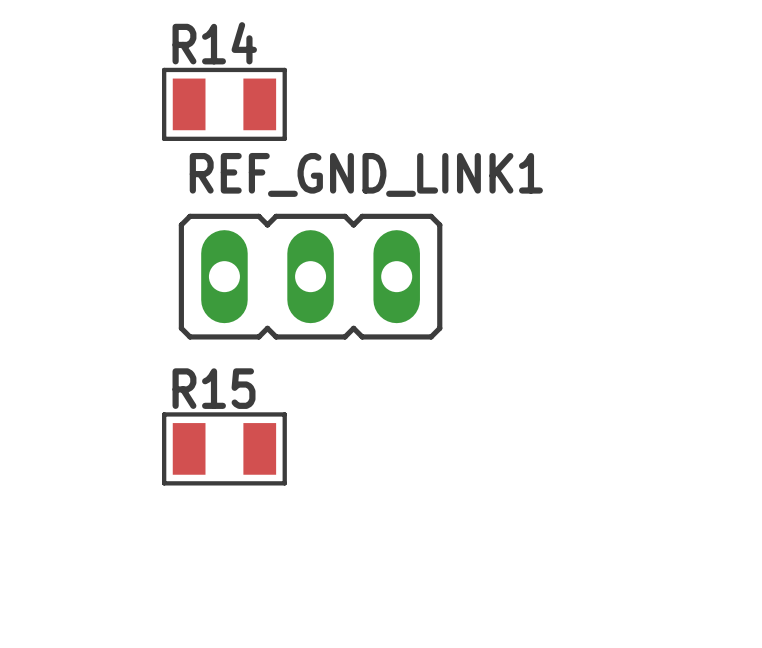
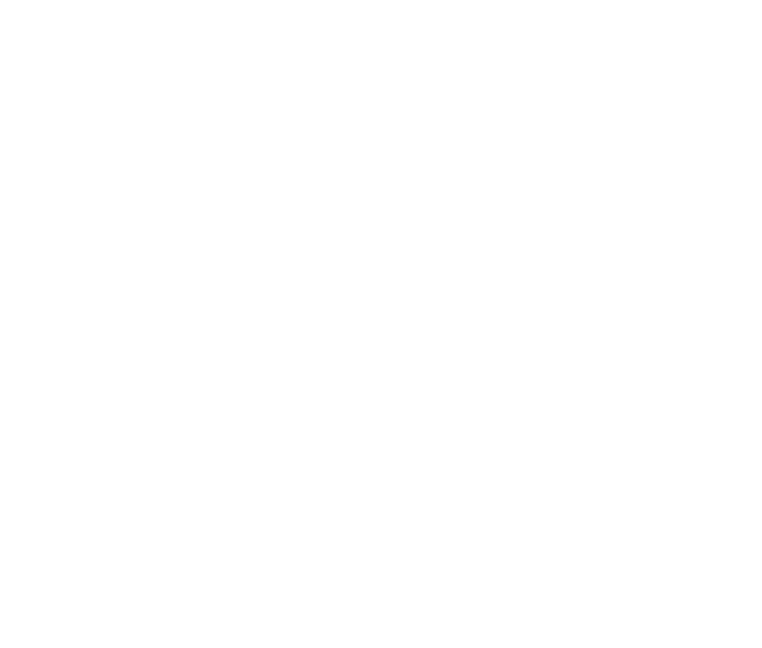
R14: (224, 104) -> none
REF_GND_LINK1: (310, 276) -> none
R15: (224, 448) -> none

